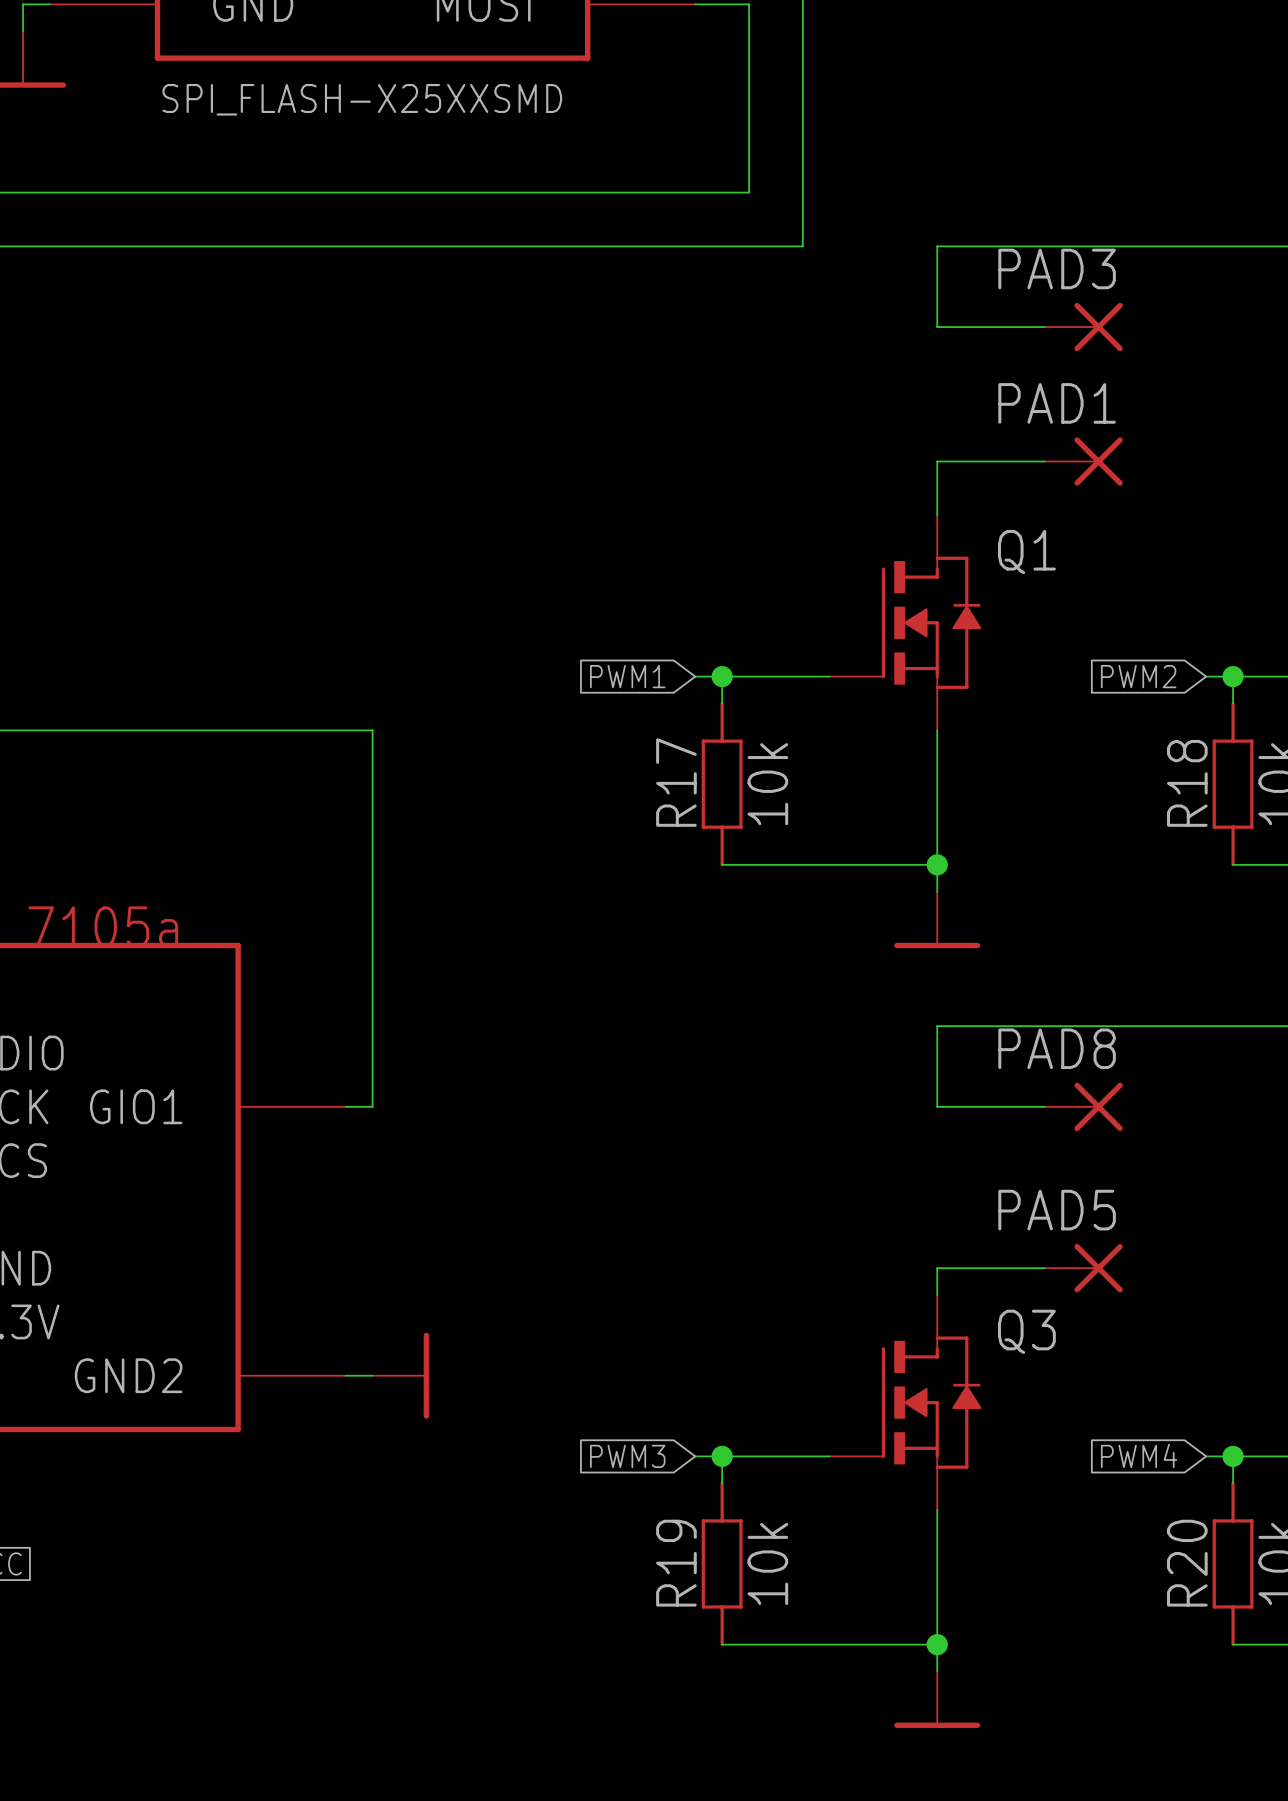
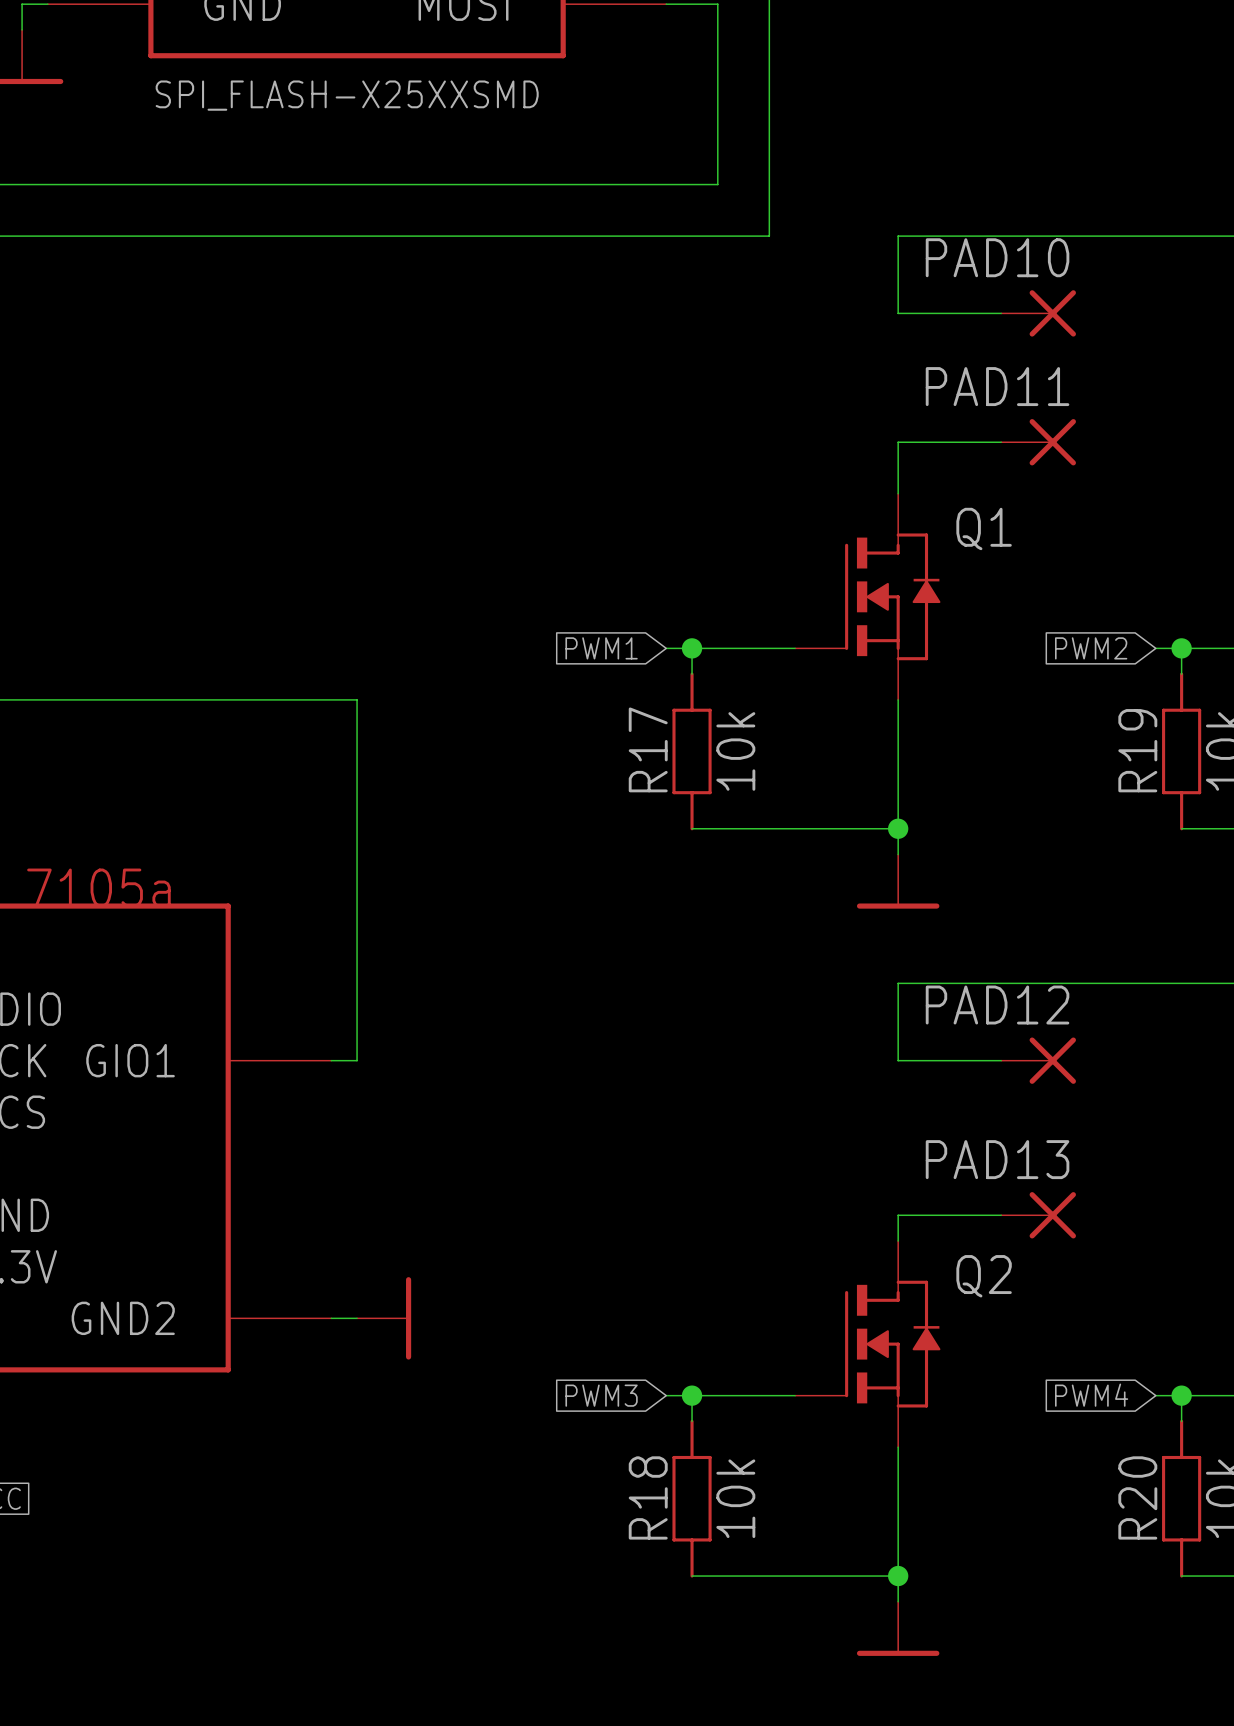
PAD3 name: PAD3 (1057, 268) -> PAD10 (997, 257)
PAD1 name: PAD1 (1057, 403) -> PAD11 (997, 386)
R18 name: R18 (1187, 783) -> R19 (1137, 750)
PAD8 name: PAD8 (1057, 1048) -> PAD12 (997, 1005)
PAD5 name: PAD5 (1057, 1210) -> PAD13 (997, 1159)
Q3 name: Q3 (1026, 1331) -> Q2 (984, 1276)
R19 name: R19 (676, 1563) -> R18 (648, 1497)

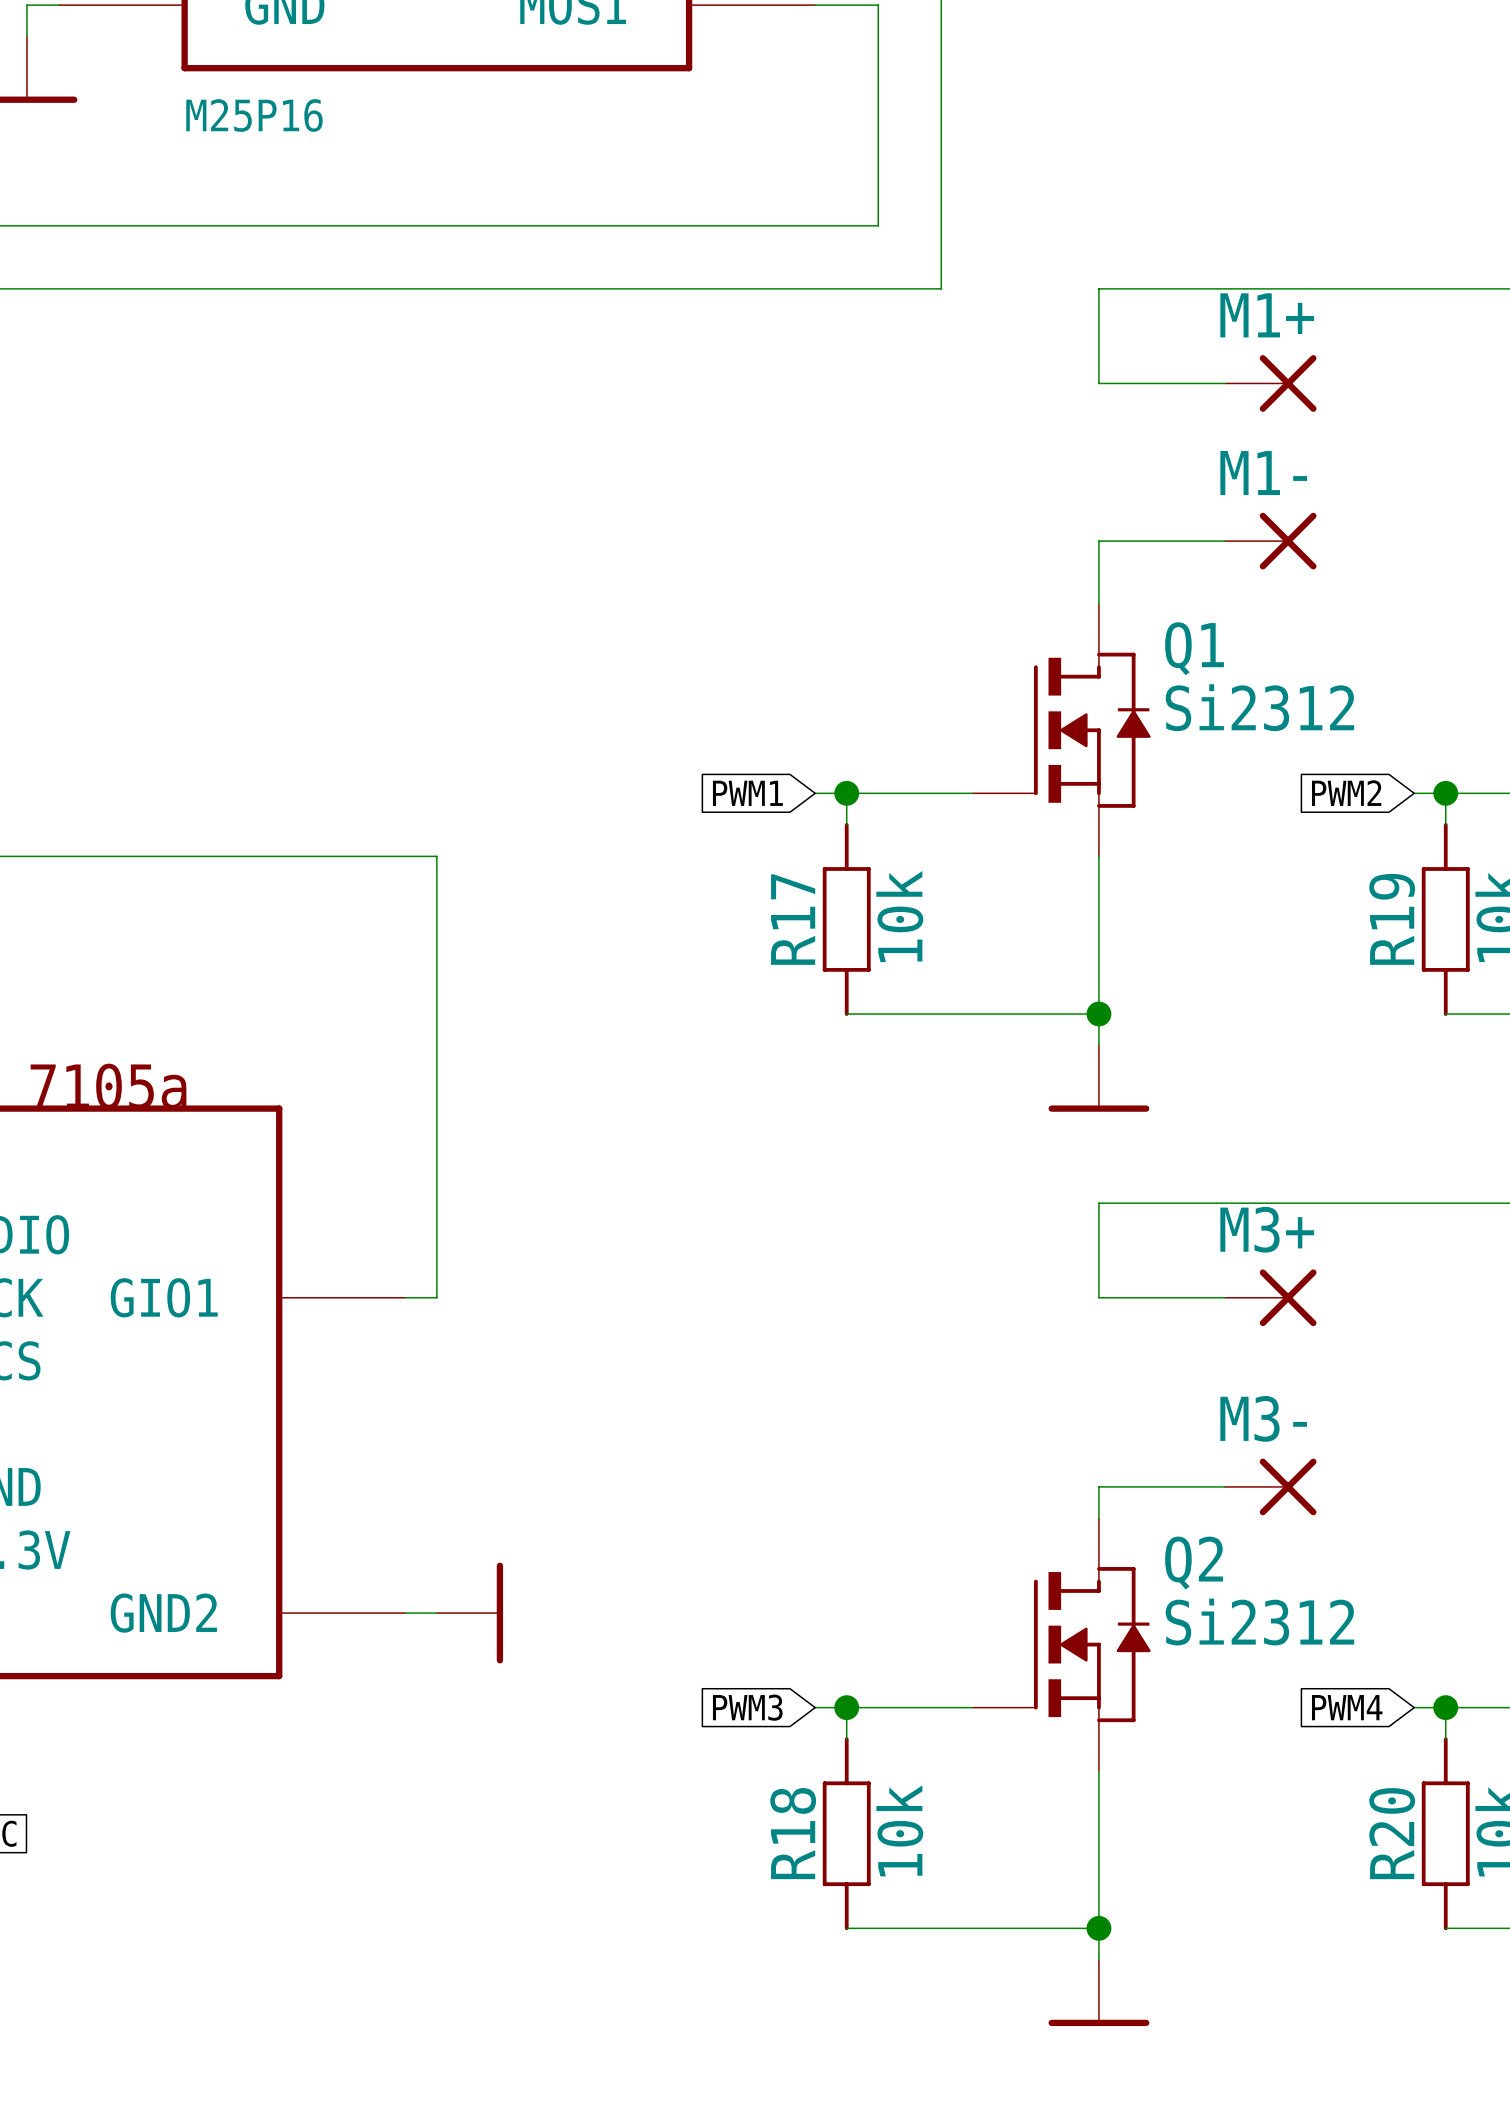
part value: SPI_FLASH-X25XXSMD (347, 95) -> M25P16 (254, 115)
PAD10 name: PAD10 (997, 257) -> M1+ (1267, 315)
PAD11 name: PAD11 (997, 386) -> M1- (1263, 473)
Q1 value: none -> Si2312 (1259, 707)
PAD12 name: PAD12 (997, 1005) -> M3+ (1267, 1229)
PAD13 name: PAD13 (997, 1159) -> M3- (1263, 1418)
Q2 value: none -> Si2312 (1259, 1622)

